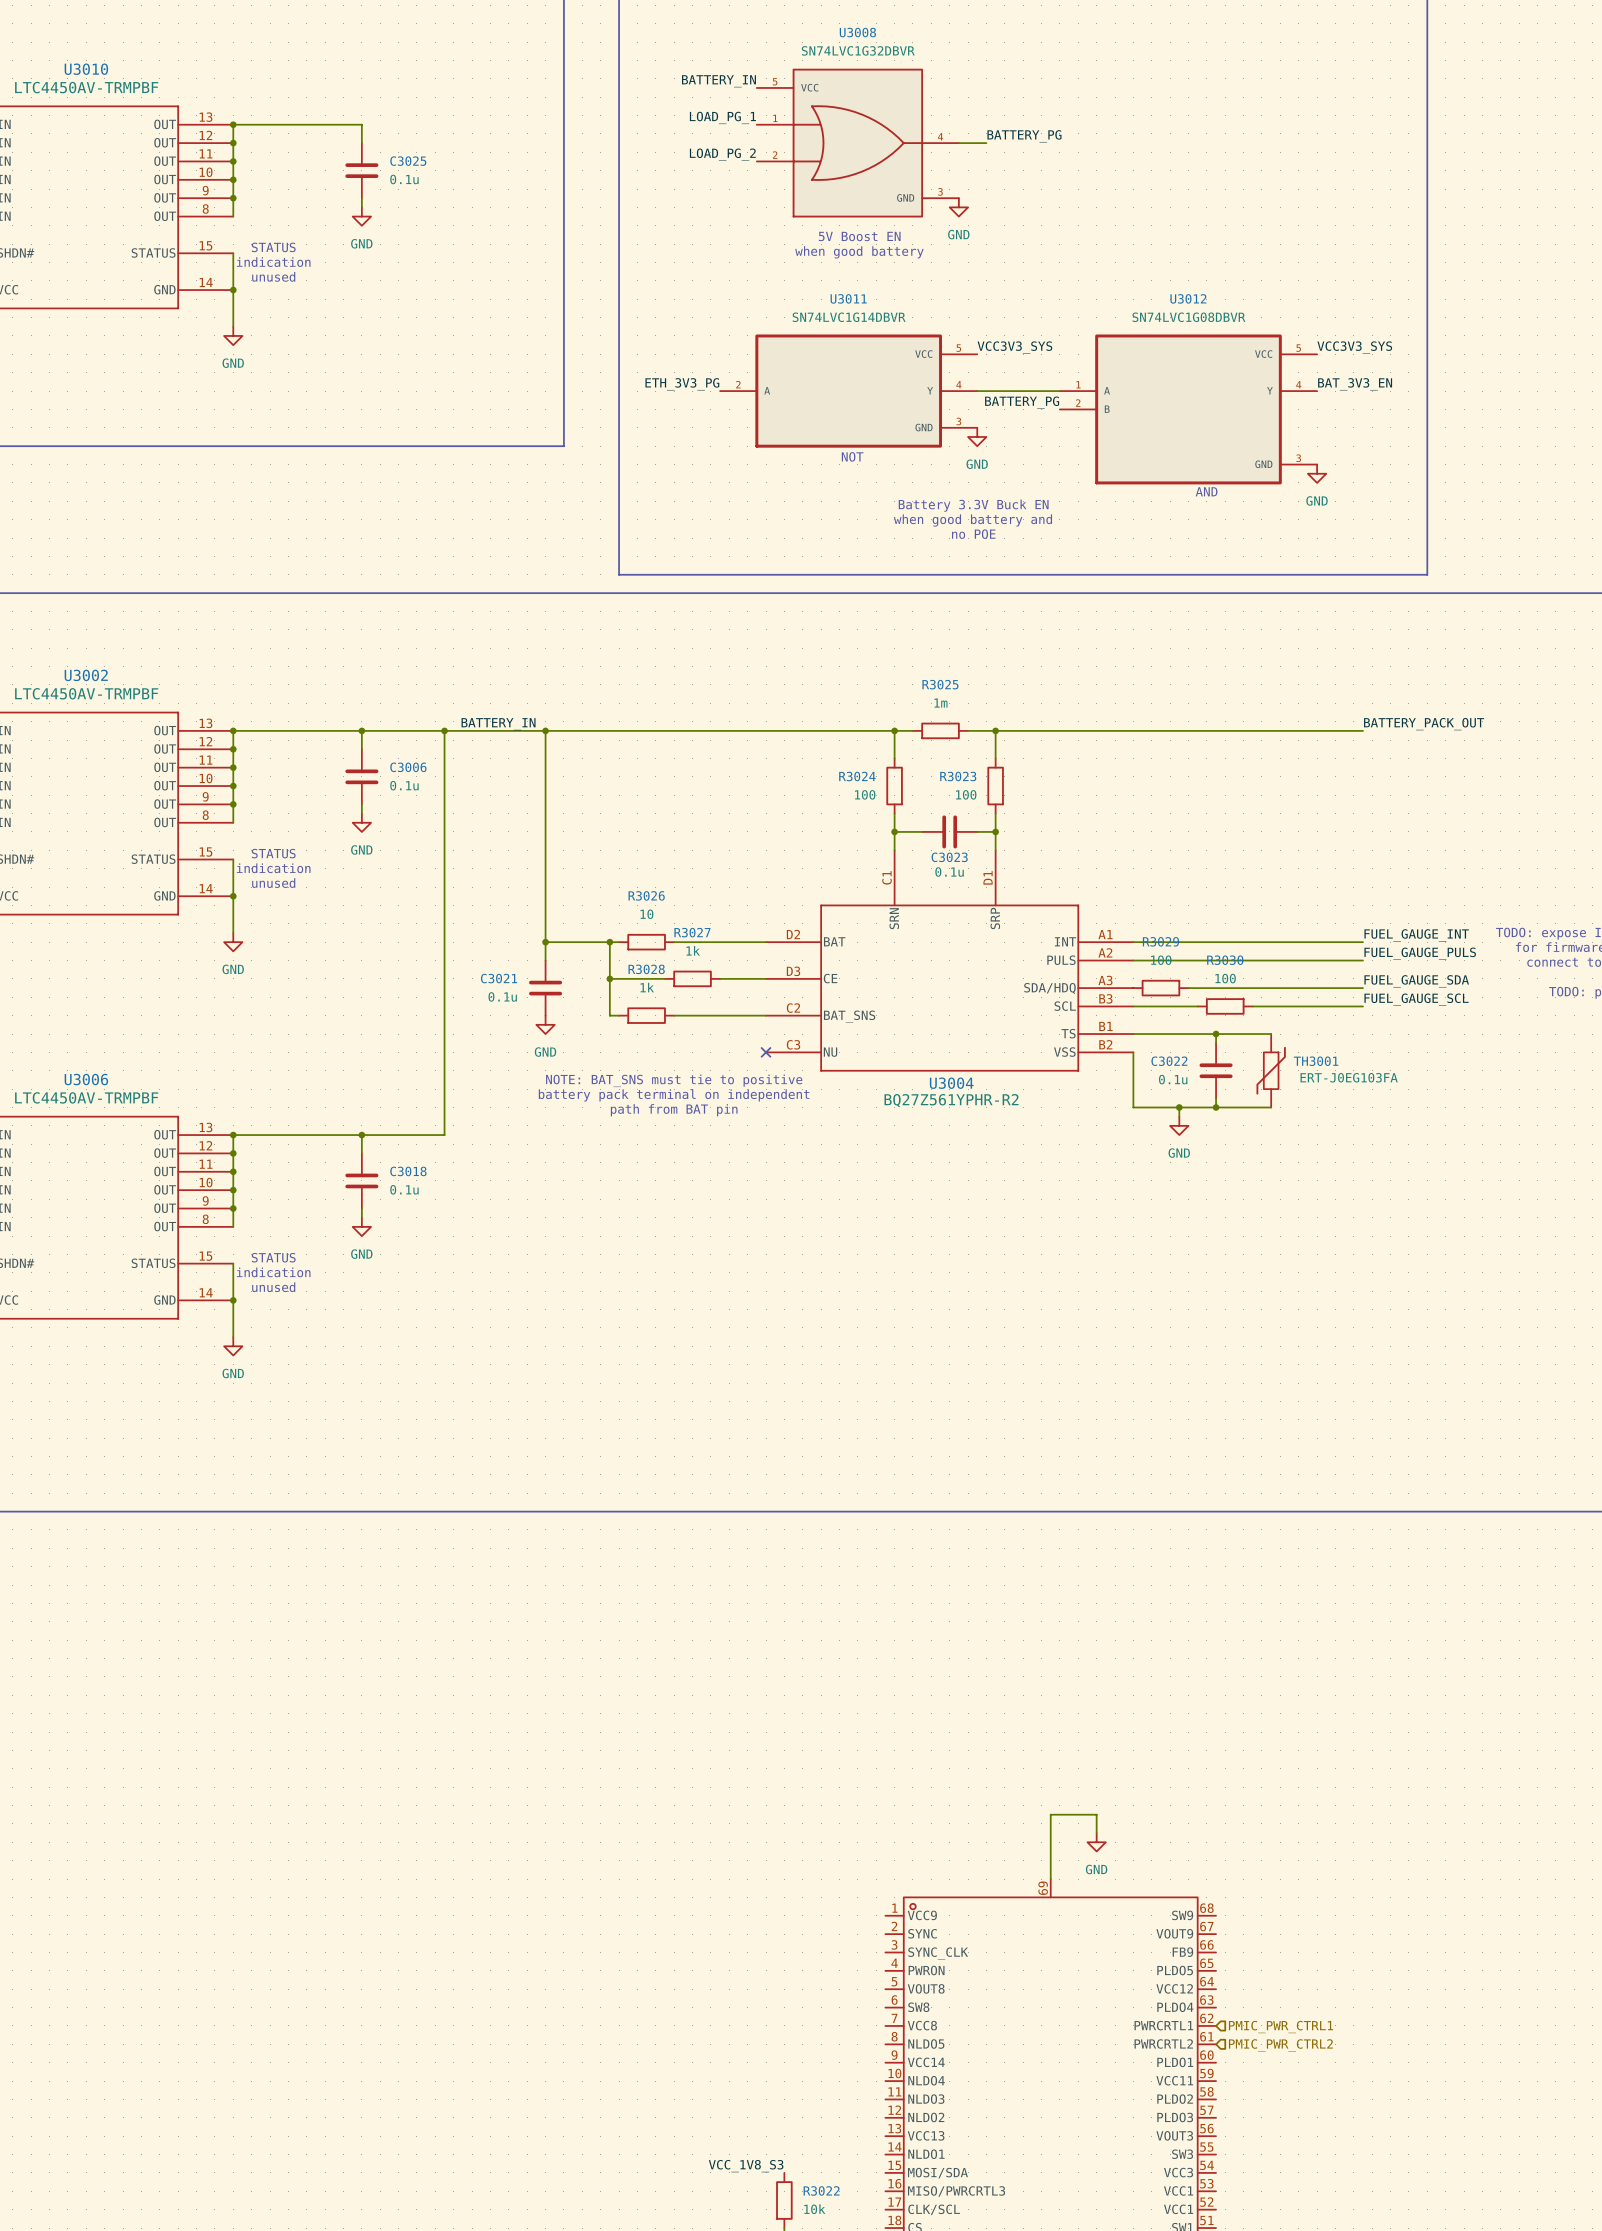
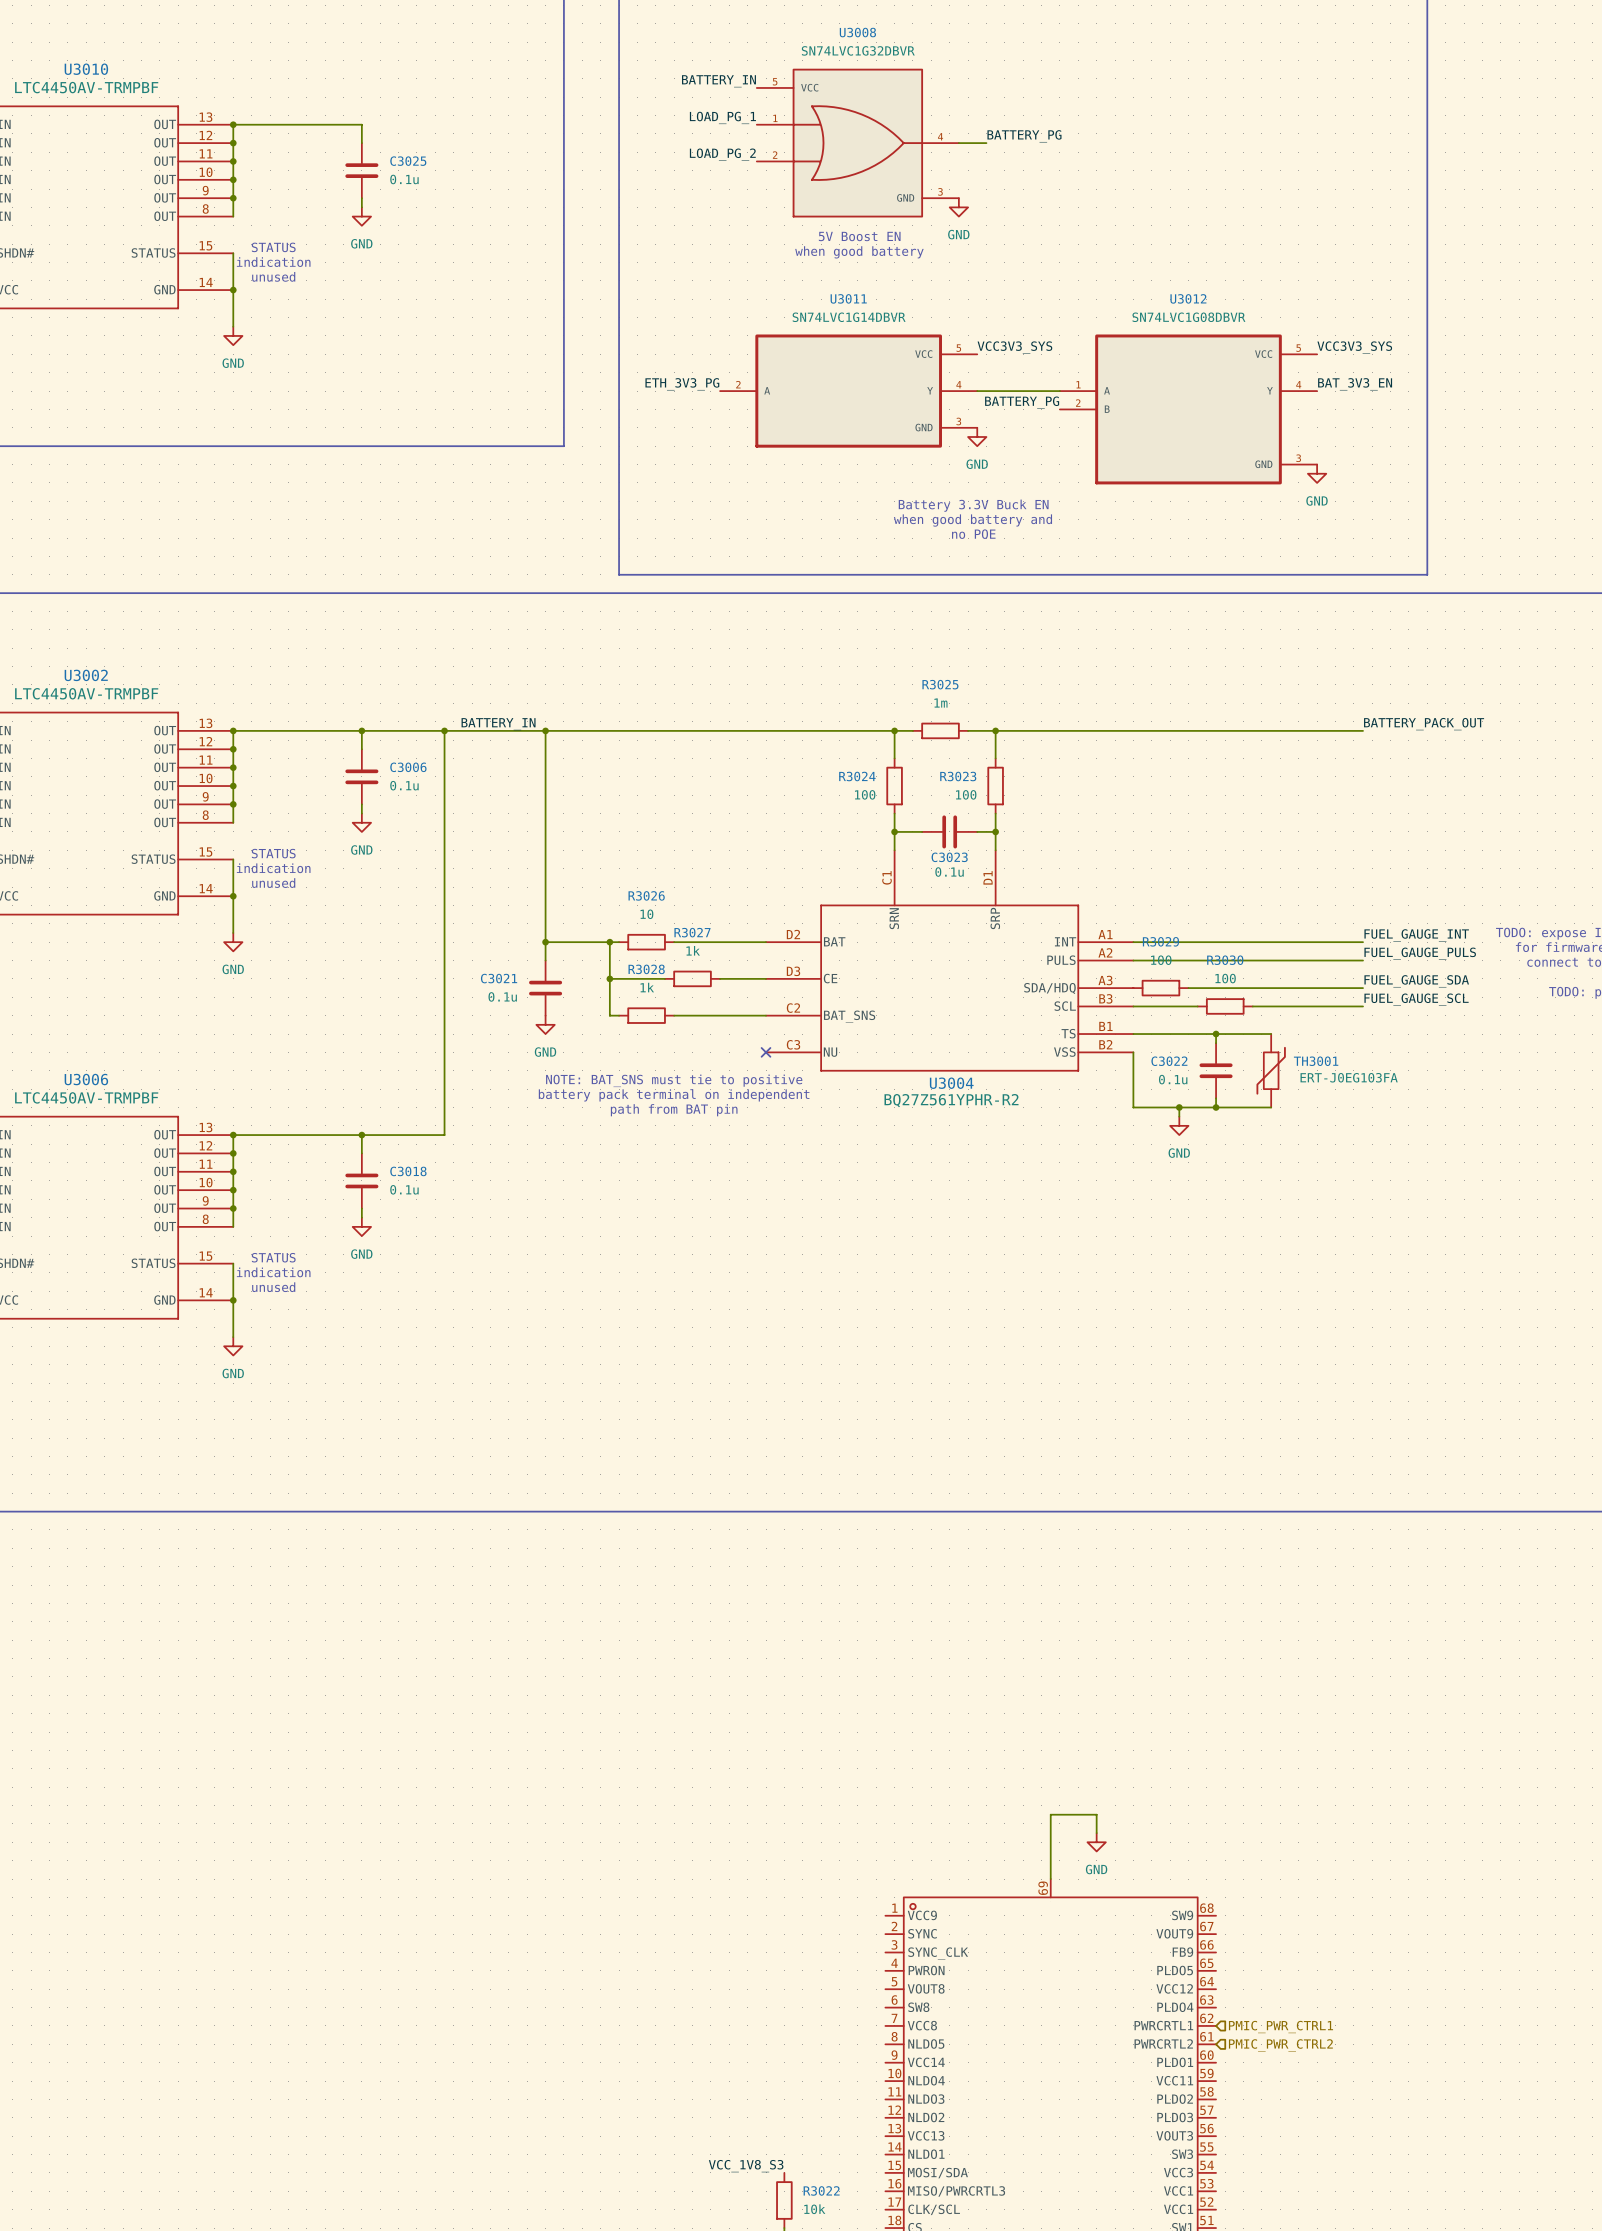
text: NOT (852, 456) -> none
text: AND (1206, 491) -> none

